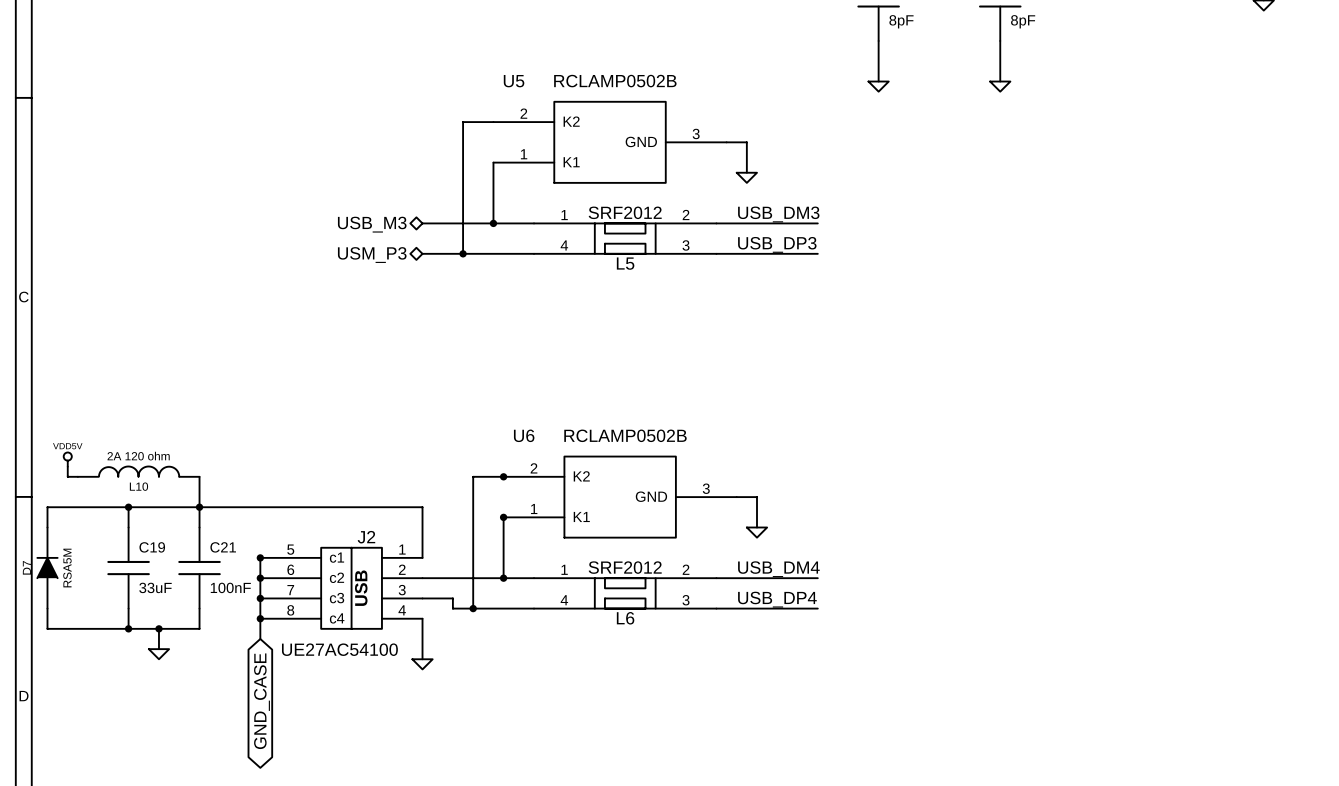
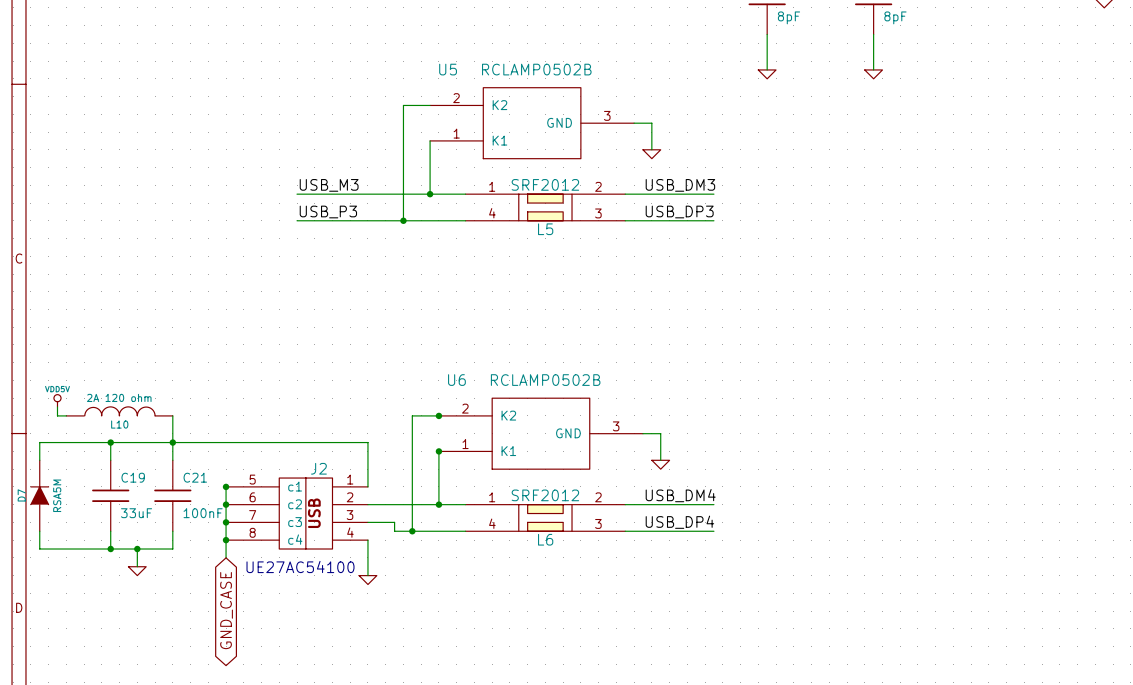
label: none -> USB_M3 (329, 185)
wire: none -> (297, 194) (367, 194)
hierarchical label: USB_M3 (372, 224) -> none
label: none -> USB_P3 (328, 211)
wire: none -> (297, 220) (367, 220)
hierarchical label: USM_P3 (372, 255) -> none

